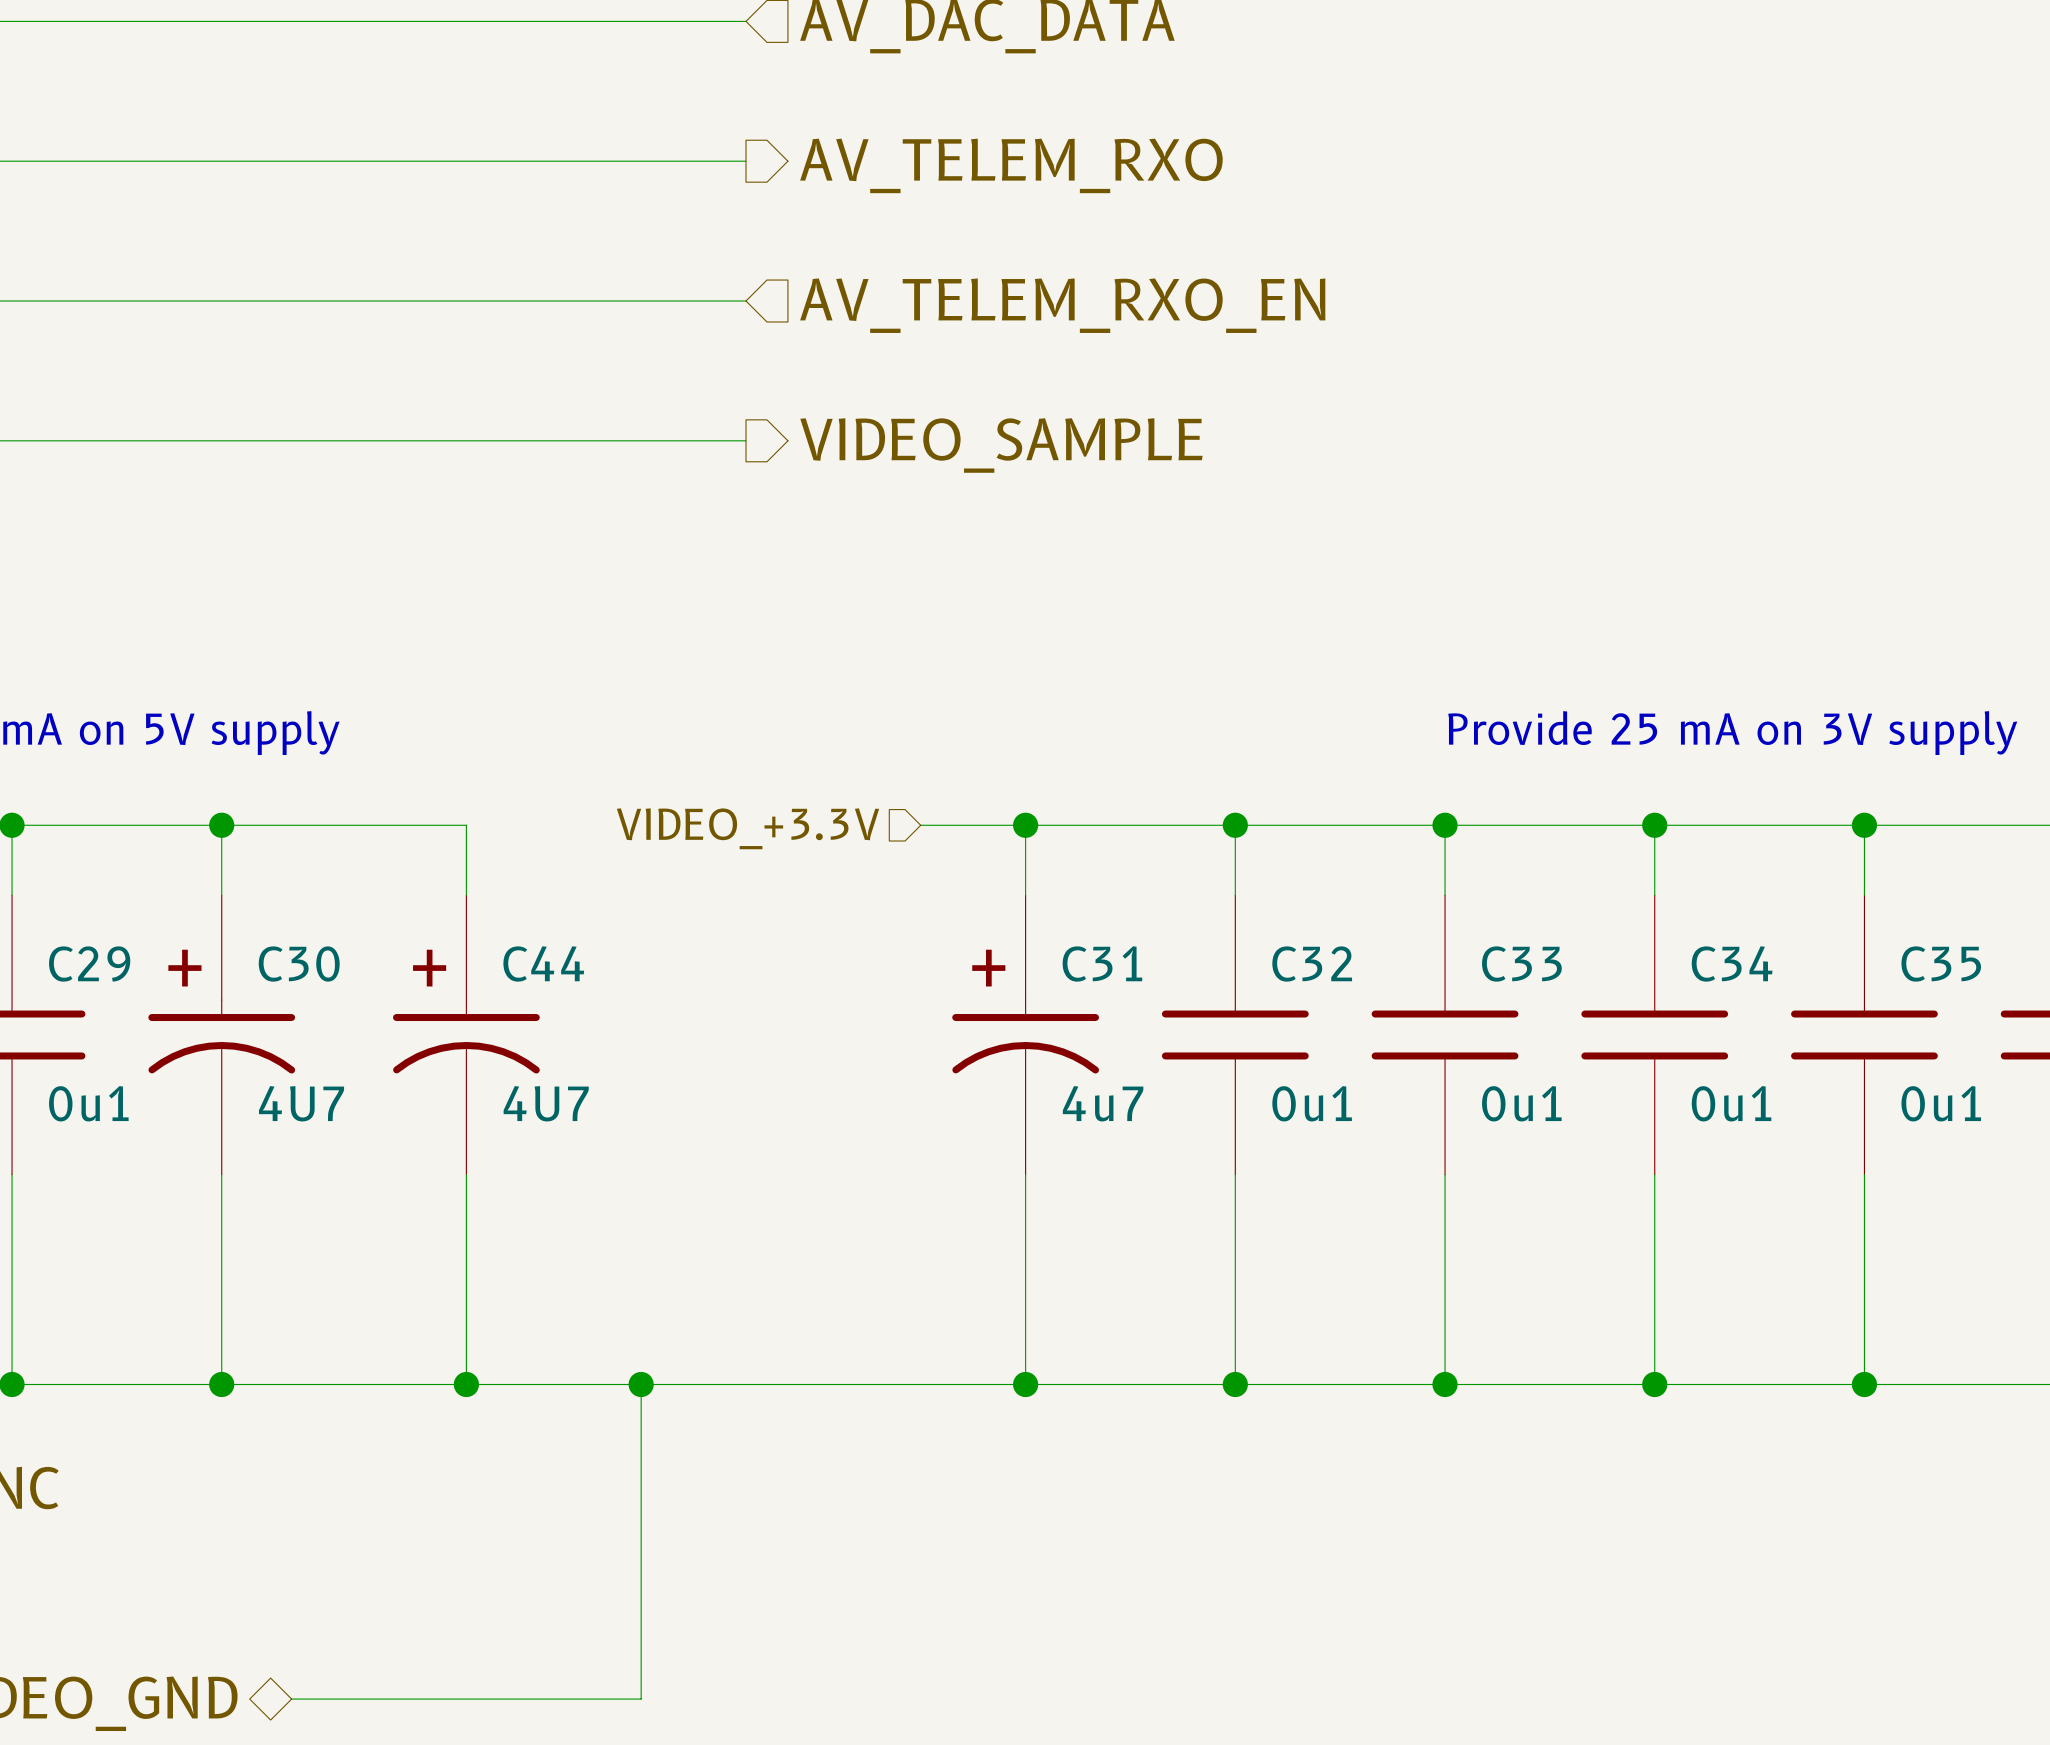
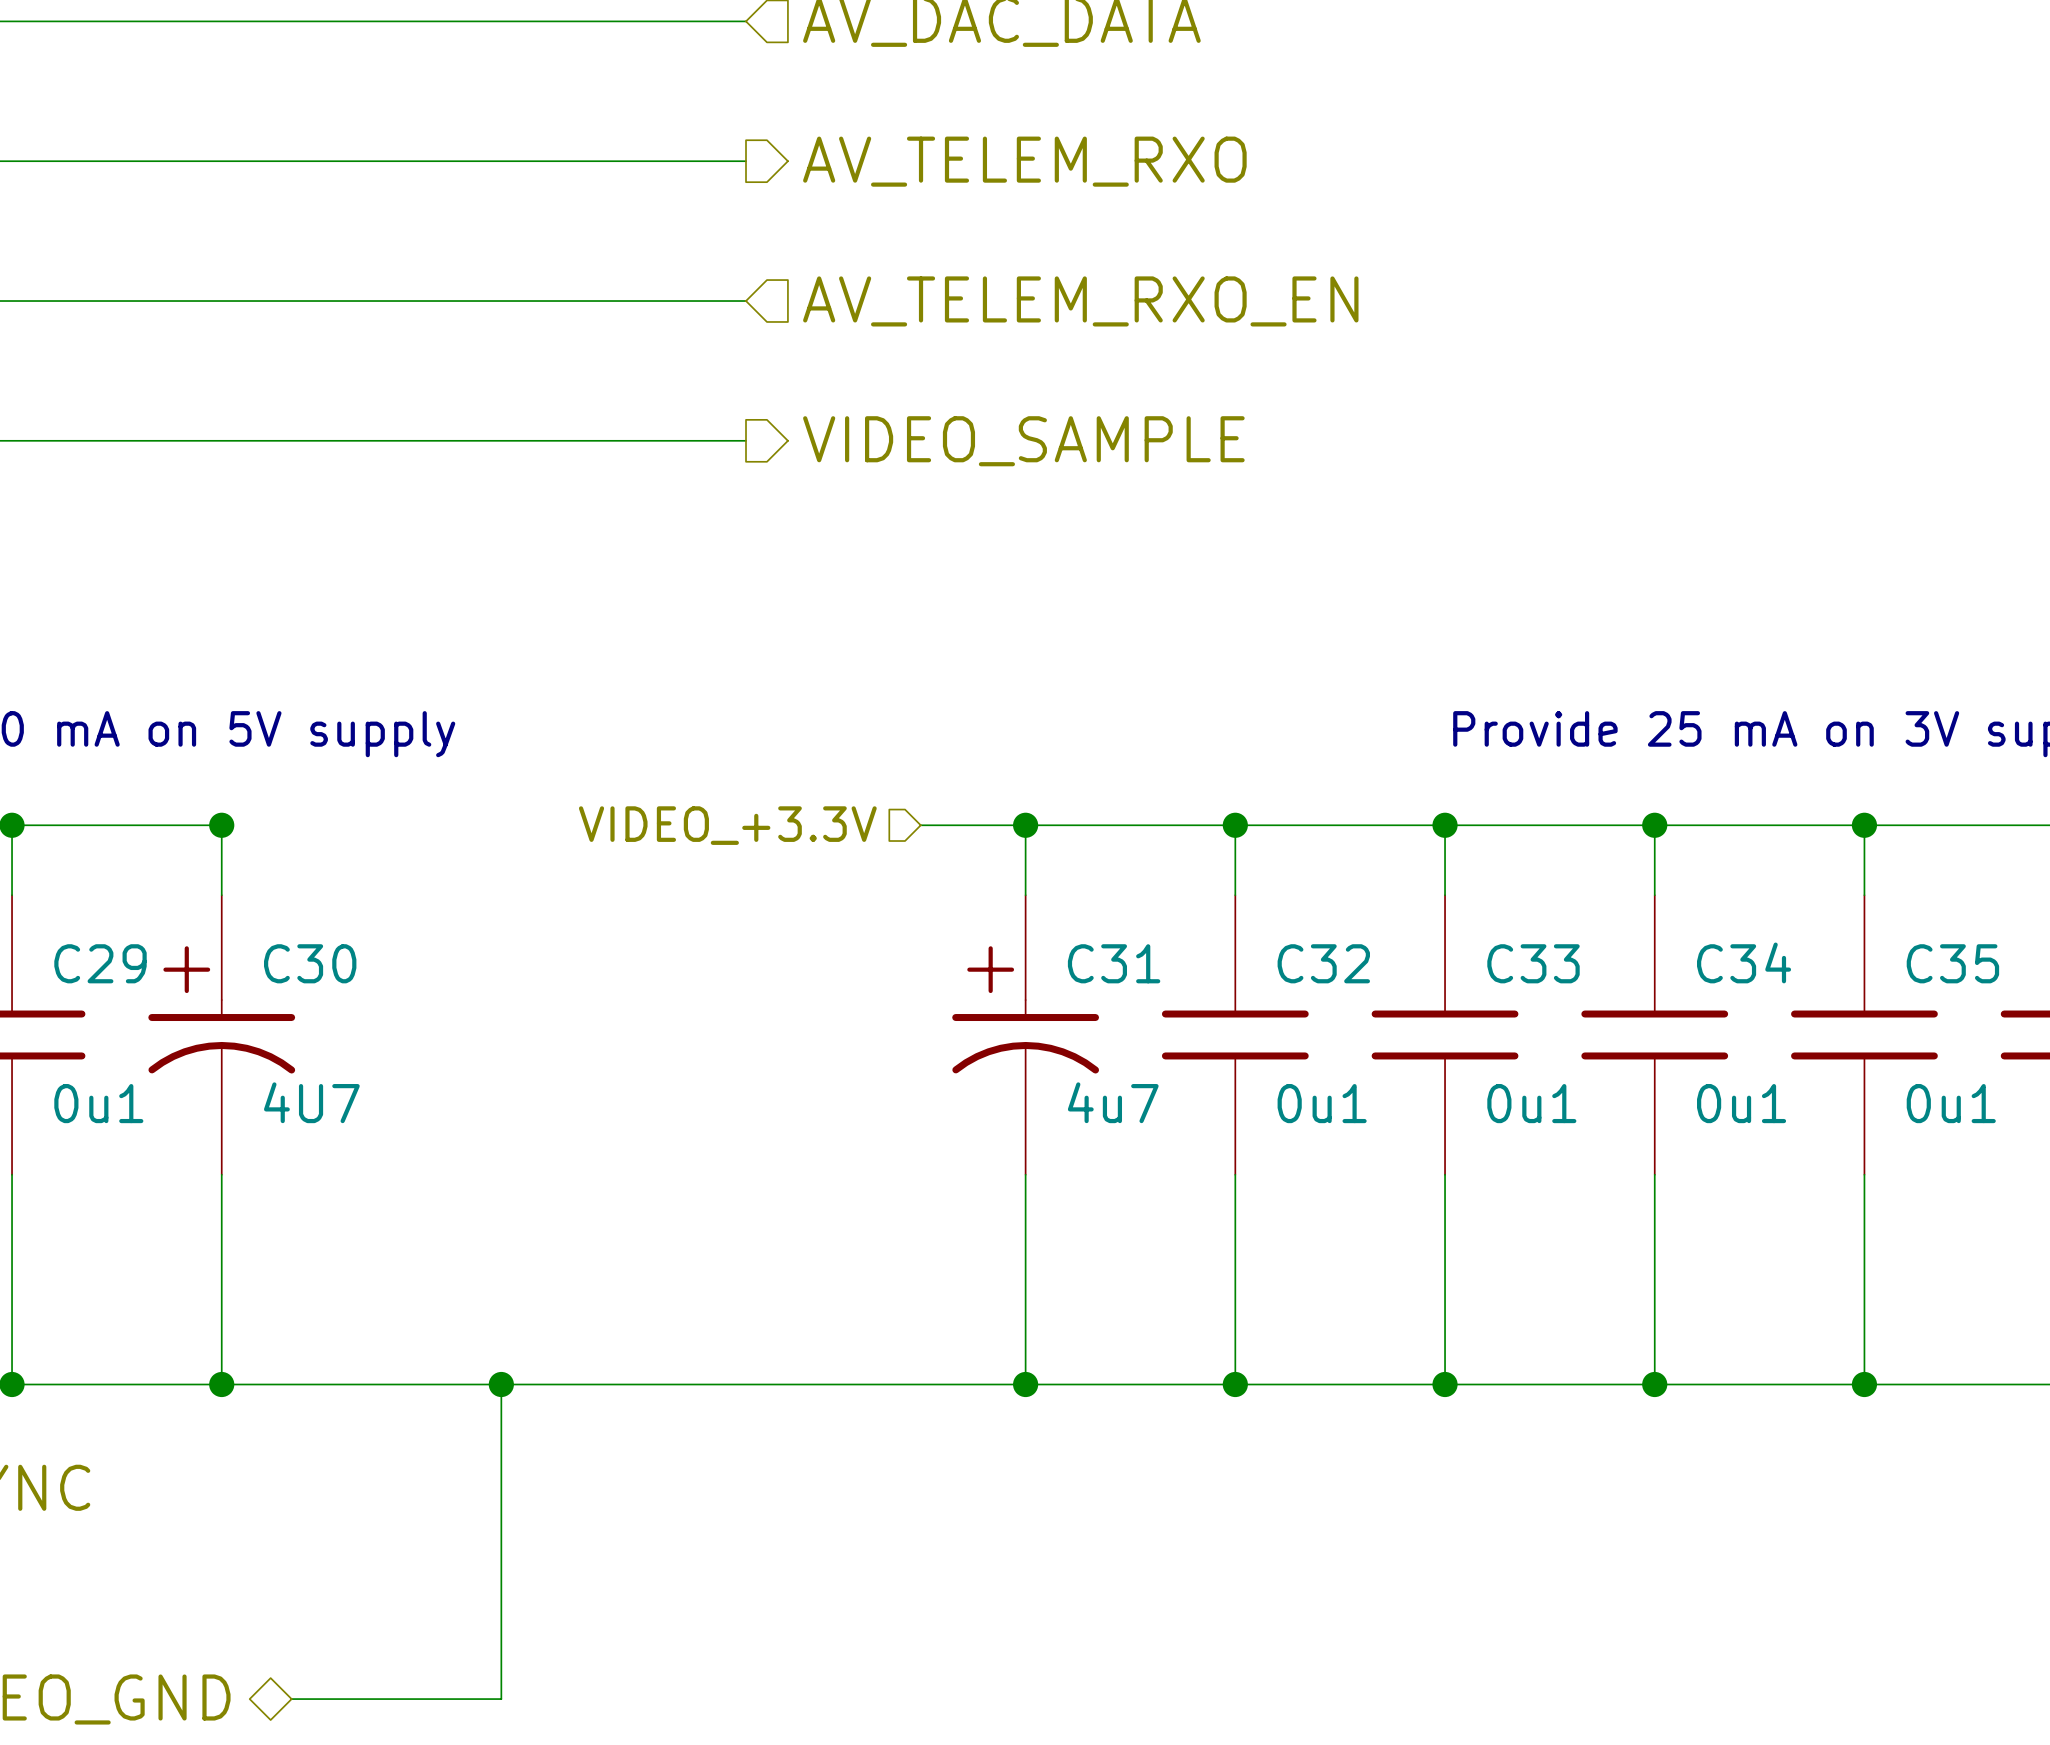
wire: (221, 825) (466, 825) (466, 895) -> none
C44: 4U7 (466, 1034) -> none
wire: (466, 1174) (466, 1384) -> none
junction position: (466, 1384) -> (501, 1384)
wire: (641, 1384) (641, 1699) (501, 1699) -> (501, 1384) (501, 1699)
junction: (641, 1384) -> none

